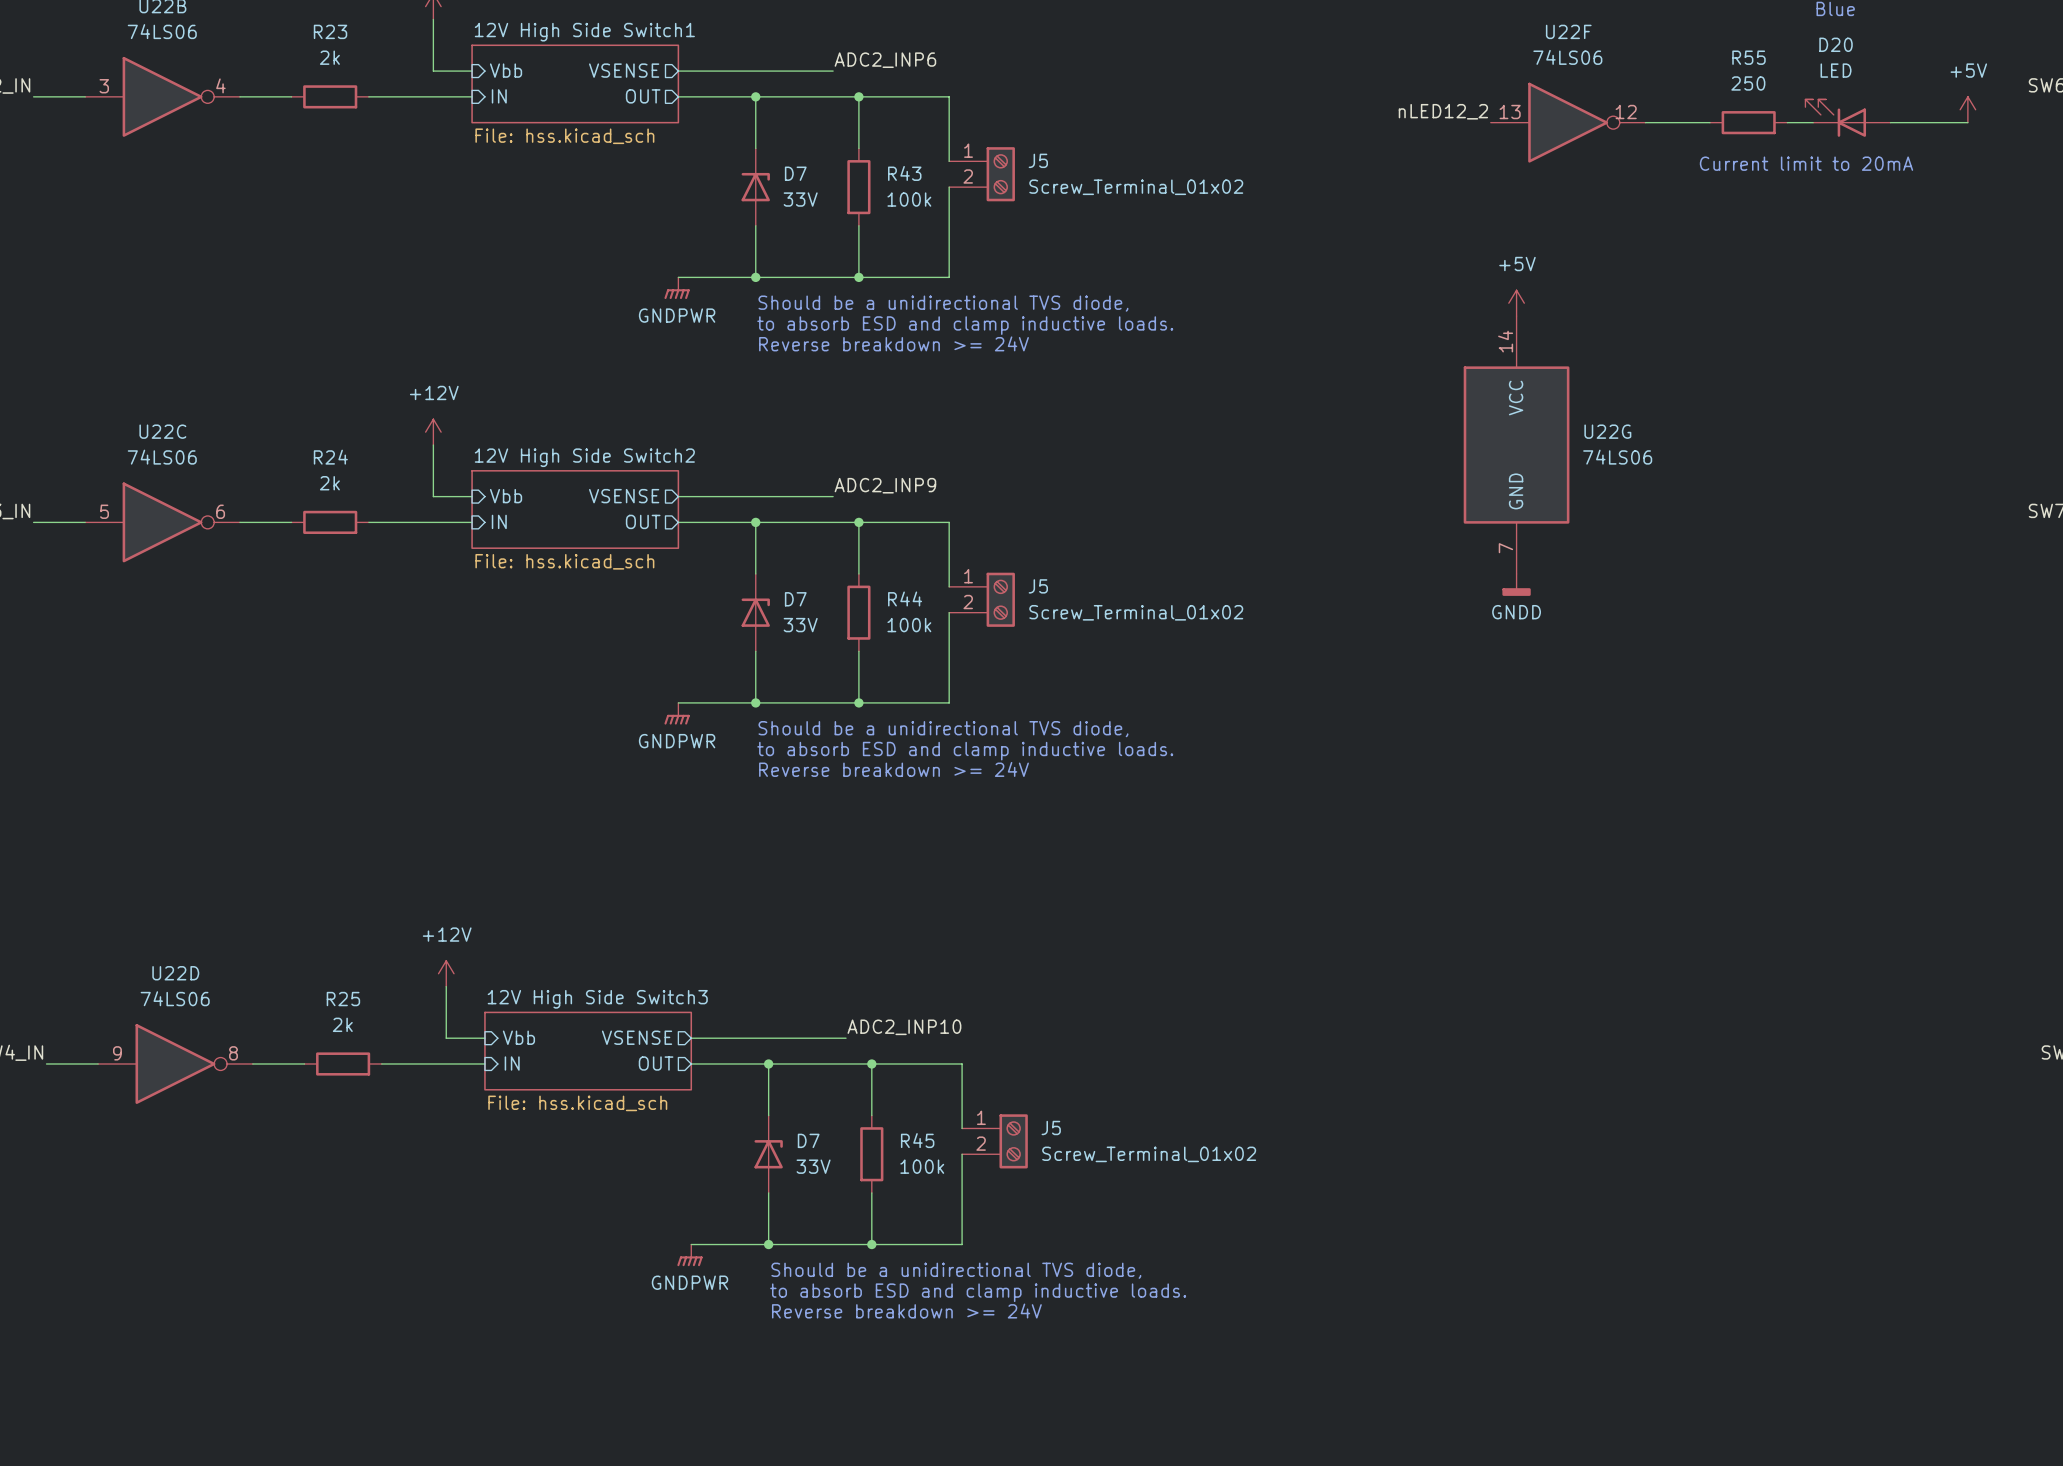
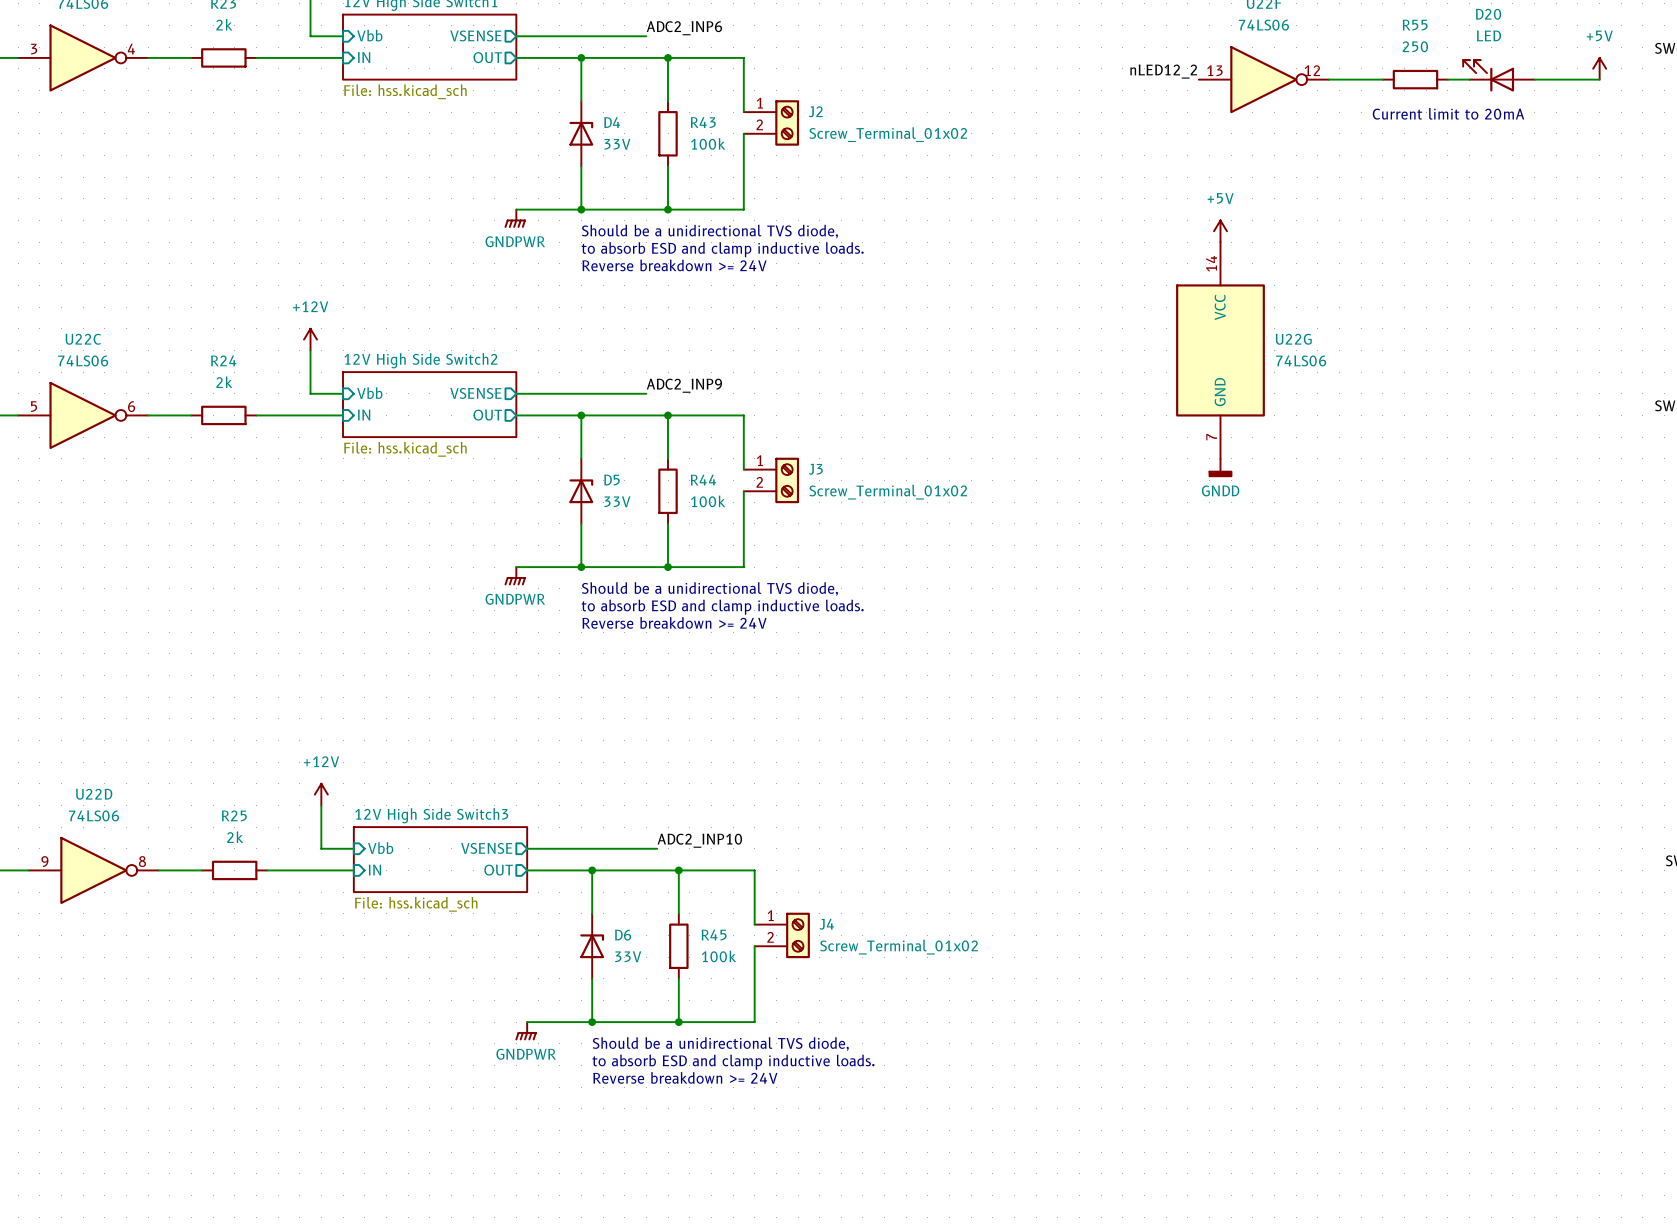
J5 name: J5 (1038, 160) -> J2 (815, 111)
D7 name: D7 (795, 173) -> D4 (612, 122)
J5 name: J5 (1038, 586) -> J3 (815, 469)
D7 name: D7 (795, 599) -> D5 (611, 480)
J5 name: J5 (1051, 1127) -> J4 (826, 924)
D7 name: D7 (808, 1140) -> D6 (623, 935)

